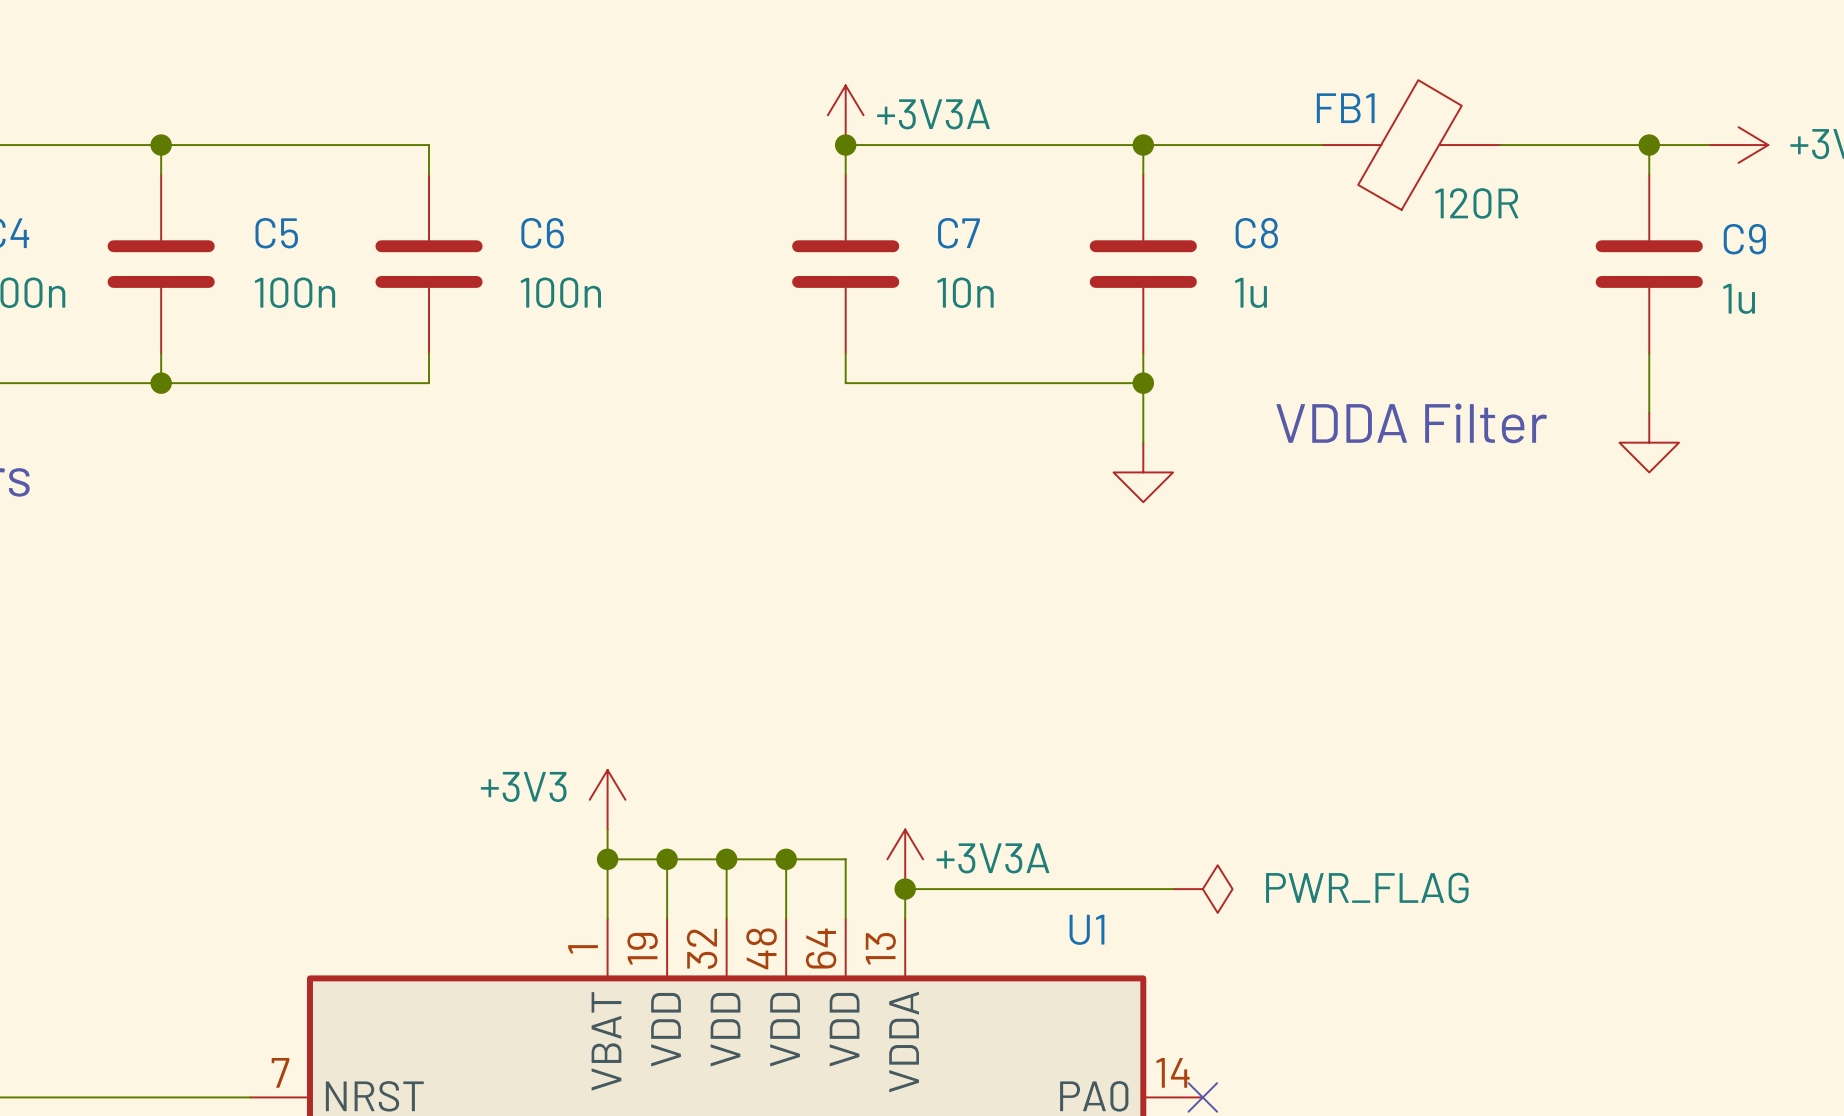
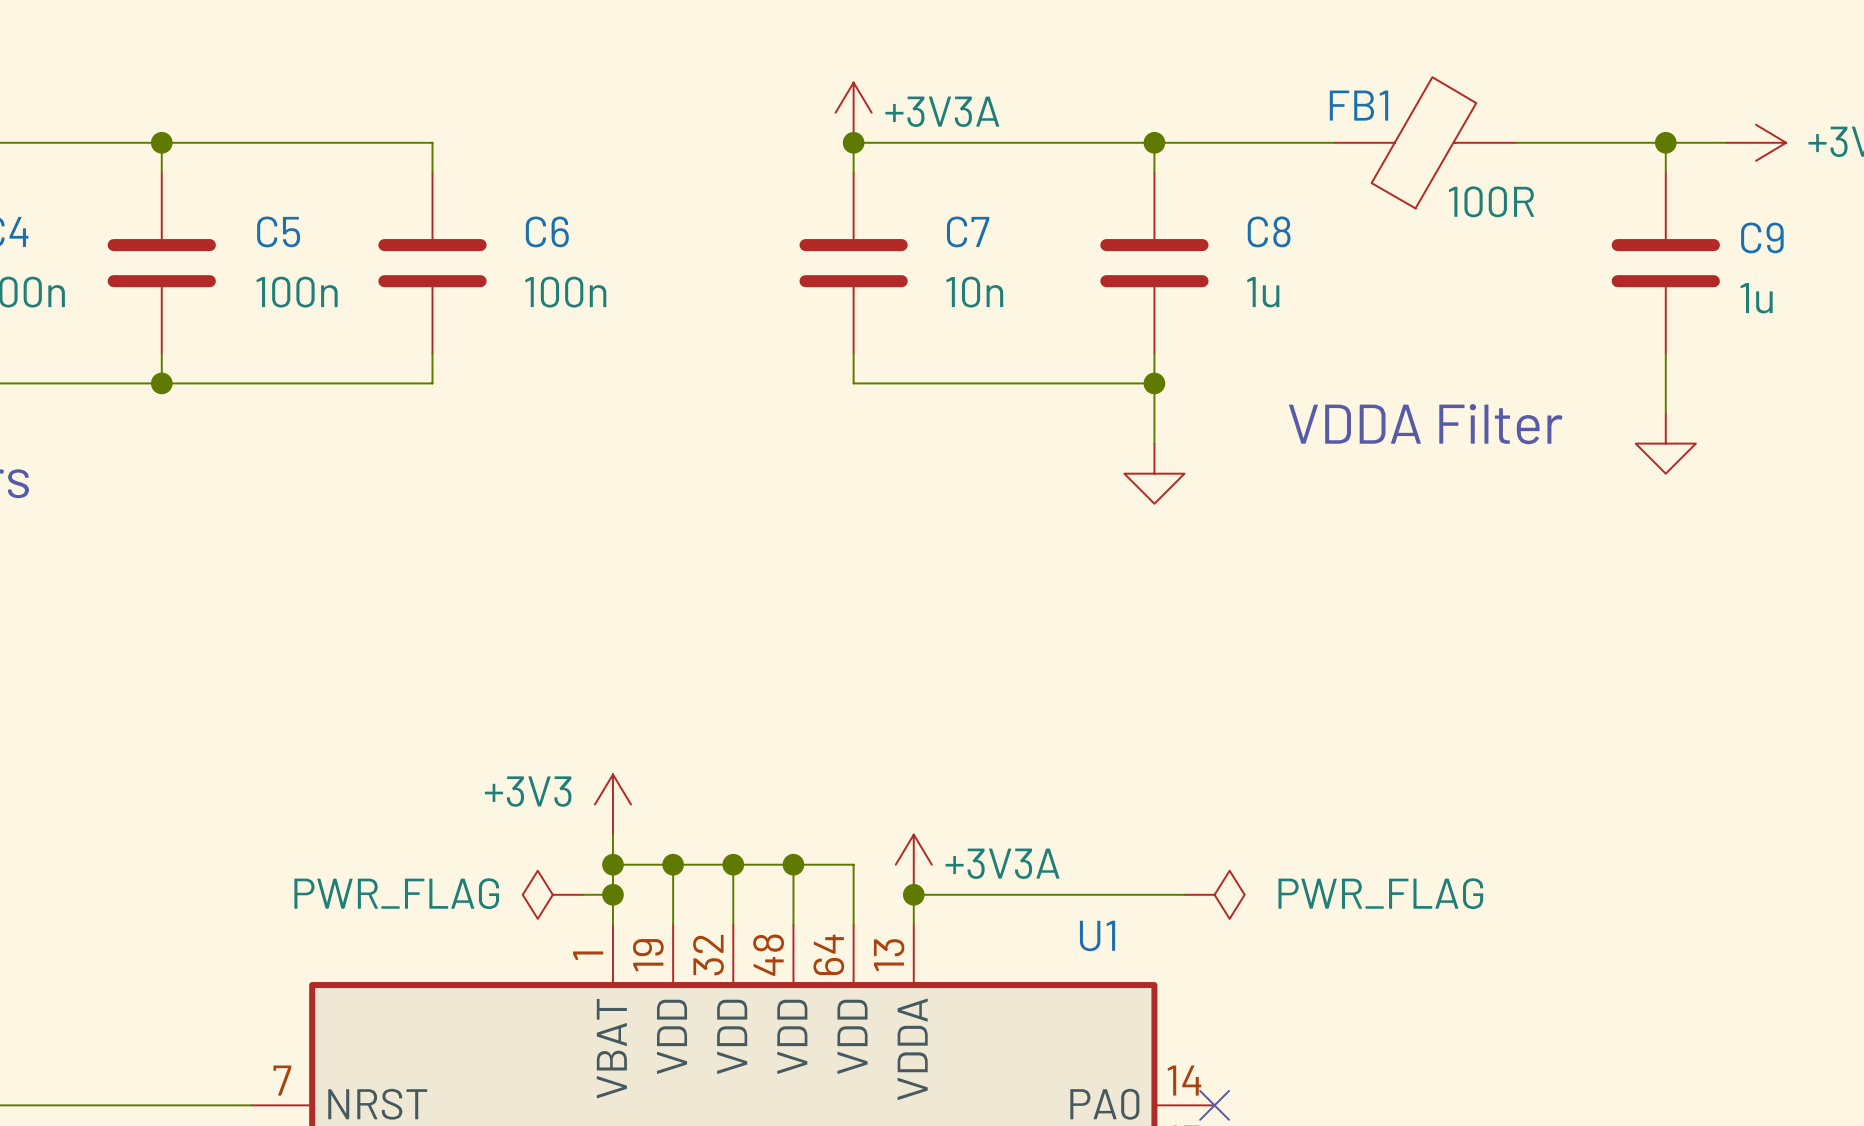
FB1 value: 120R (1476, 203) -> 100R (1491, 201)
power symbol: none -> PWR_FLAG (552, 894)
wire: none -> (582, 894) (612, 894)
junction: none -> (612, 894)

